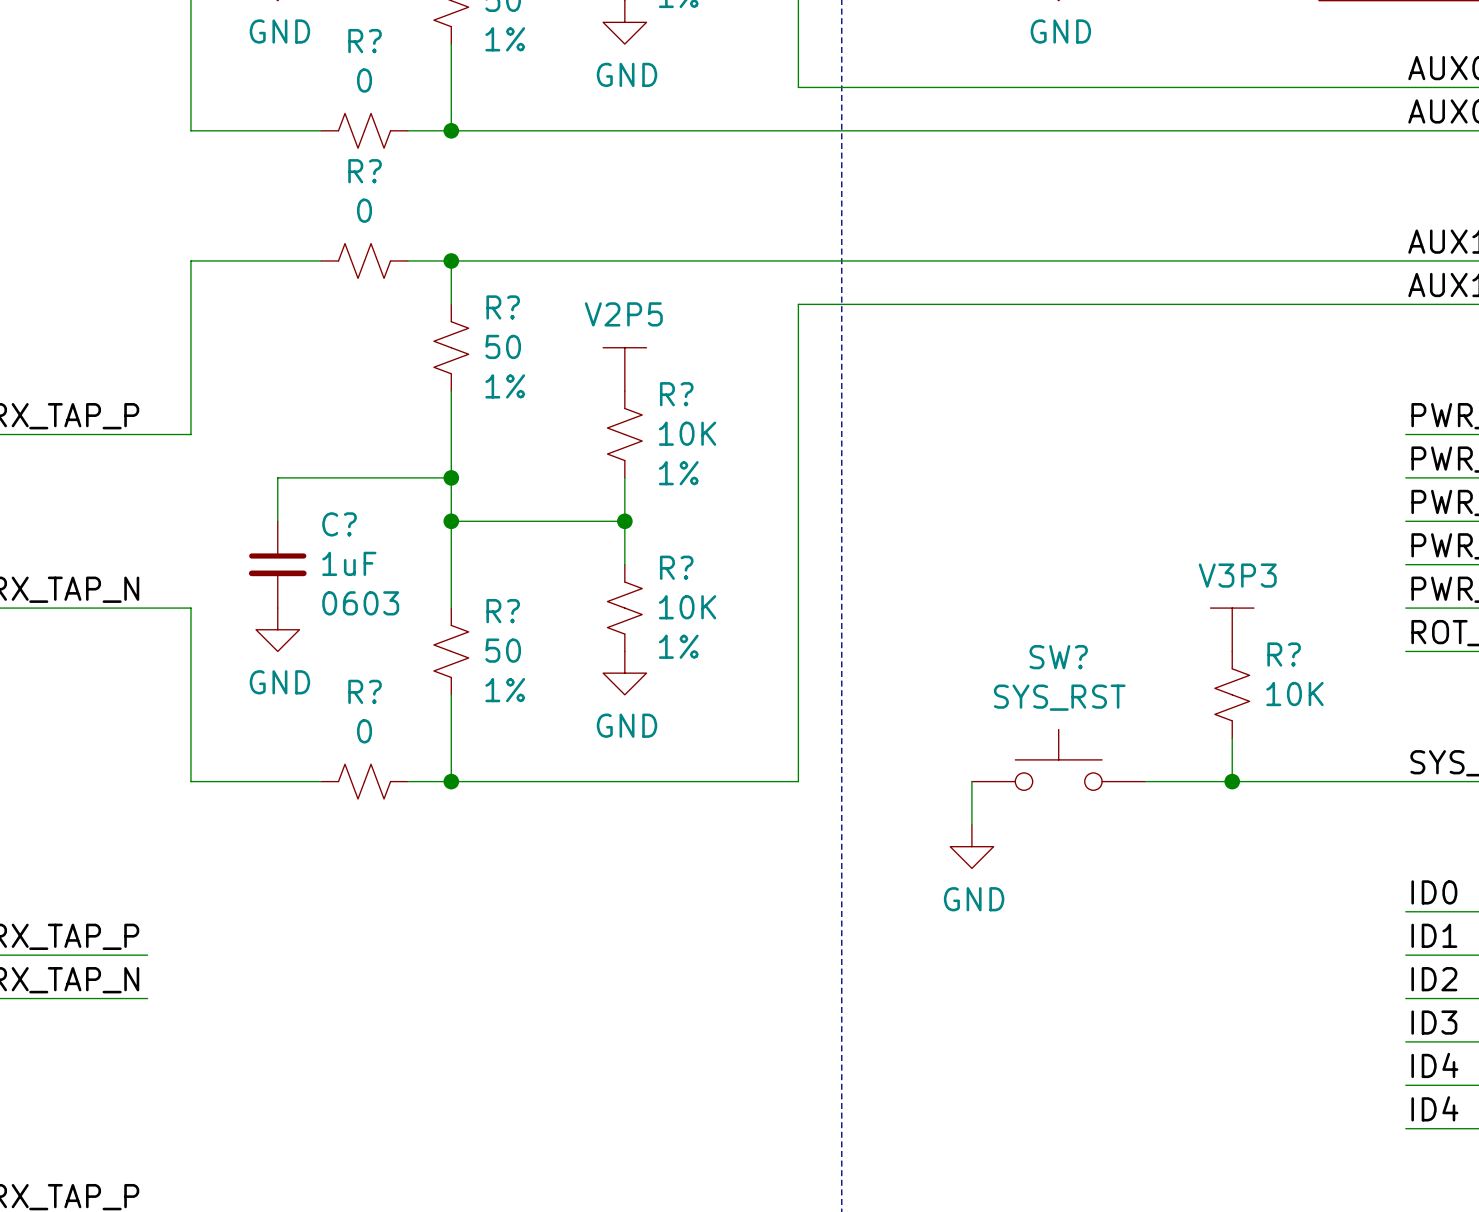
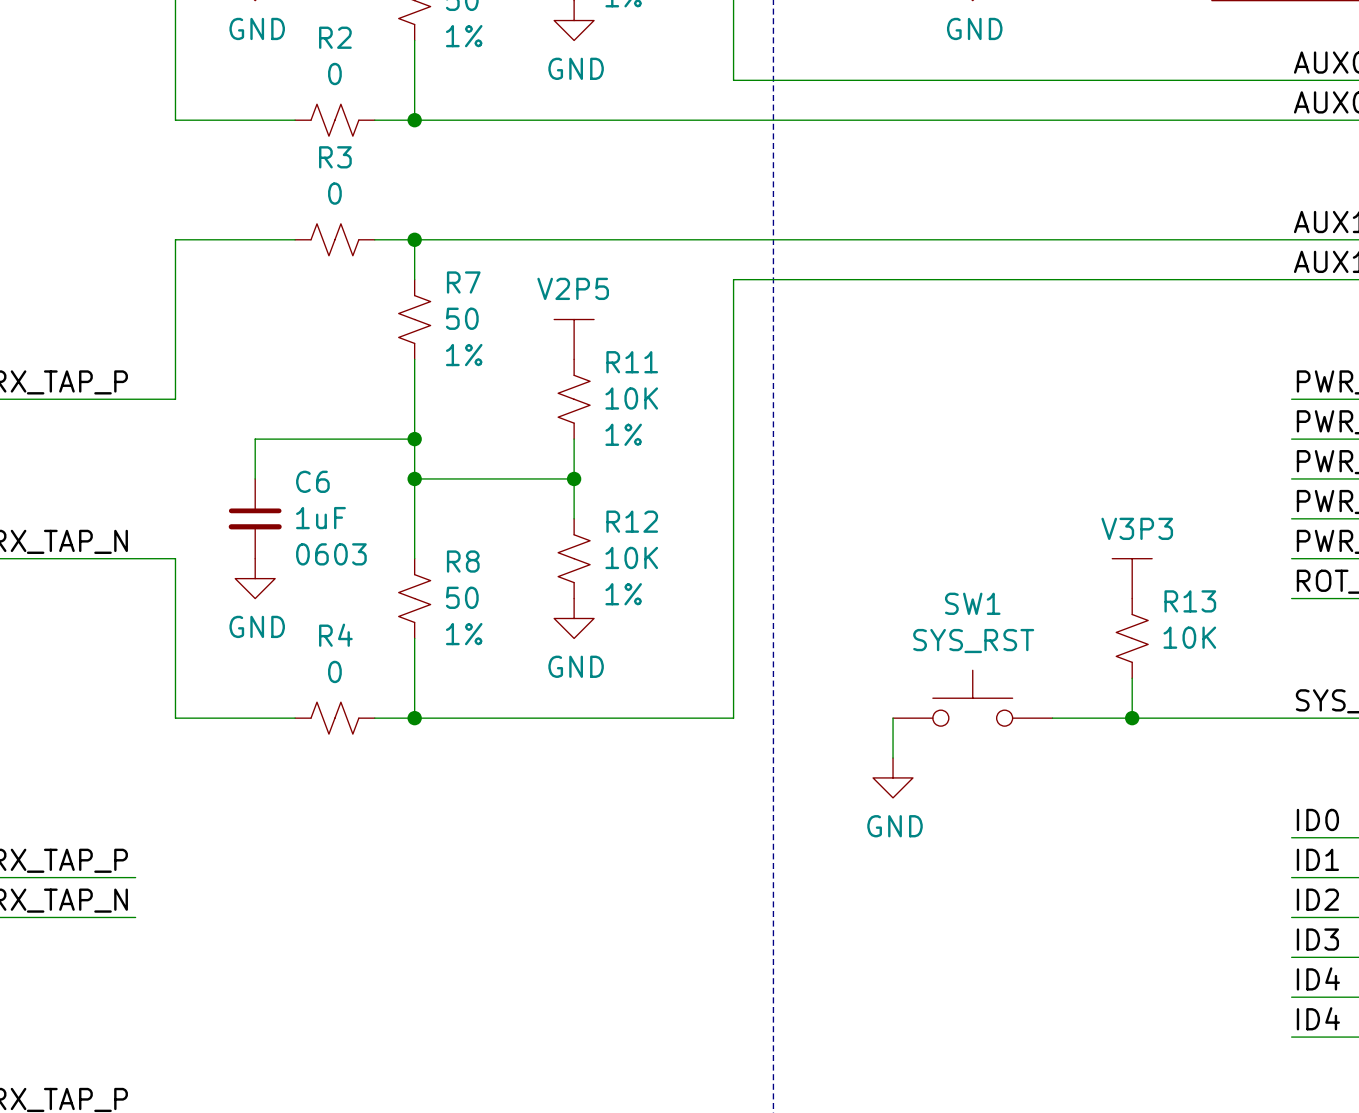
R? name: R? (365, 41) -> R2 (335, 37)
R? name: R? (365, 171) -> R3 (335, 157)
R? name: R? (503, 307) -> R7 (463, 282)
R? name: R? (676, 394) -> R11 (632, 362)
C? name: C? (339, 524) -> C6 (312, 481)
R? name: R? (676, 567) -> R12 (632, 521)
R? name: R? (503, 611) -> R8 (463, 561)
R? name: R? (1284, 654) -> R13 (1190, 601)
SW? name: SW? (1058, 657) -> SW1 (972, 603)
R? name: R? (365, 691) -> R4 (335, 635)

